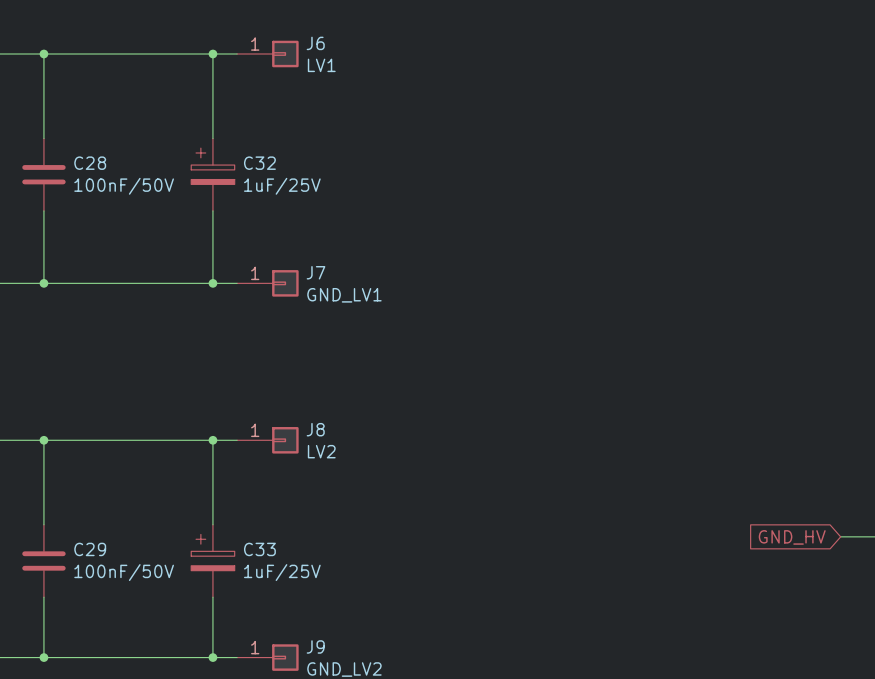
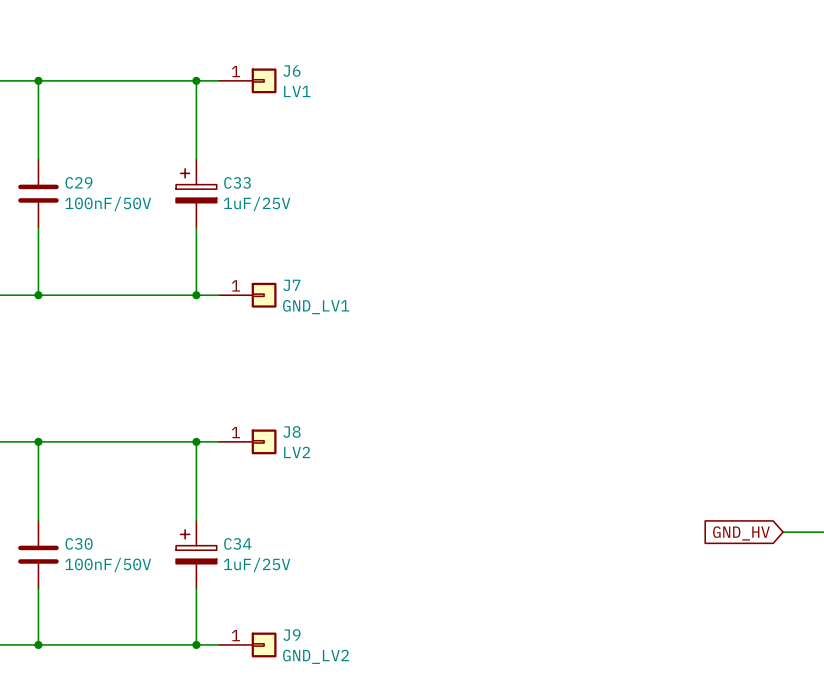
C28 name: C28 (90, 163) -> C29 (79, 182)
C32 name: C32 (259, 163) -> C33 (237, 182)
C29 name: C29 (90, 549) -> C30 (79, 543)
C33 name: C33 (259, 549) -> C34 (237, 543)

